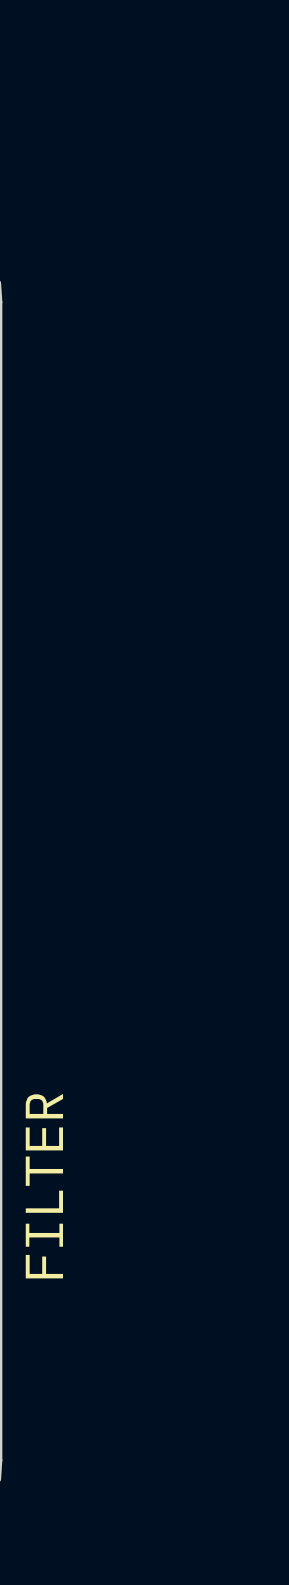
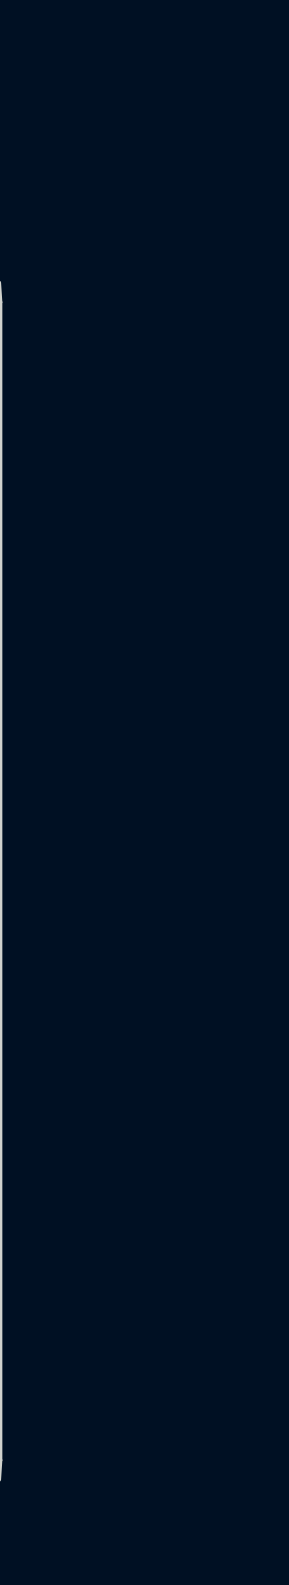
text: FILTER (44, 1186) -> none

